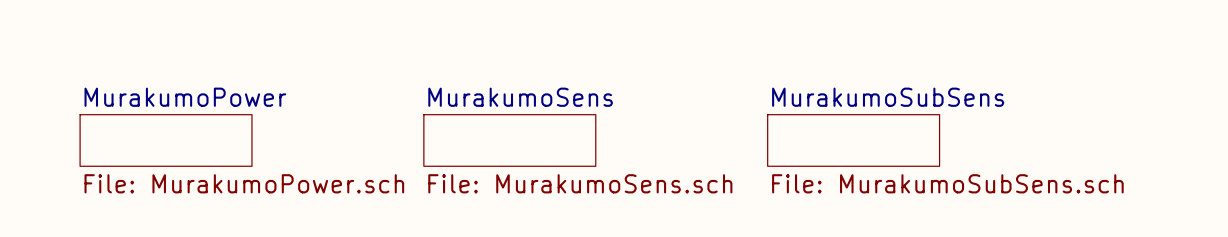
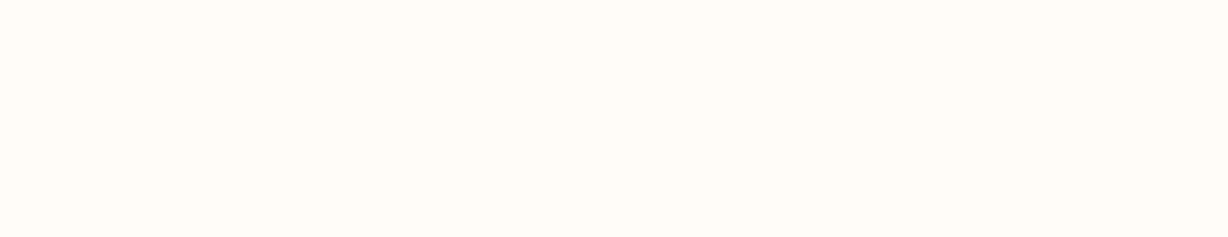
sheet MurakumoPower: File: MurakumoPower.sch (166, 140) -> none
sheet MurakumoSens: File: MurakumoSens.sch (509, 140) -> none
sheet MurakumoSubSens: File: MurakumoSubSens.sch (853, 140) -> none

